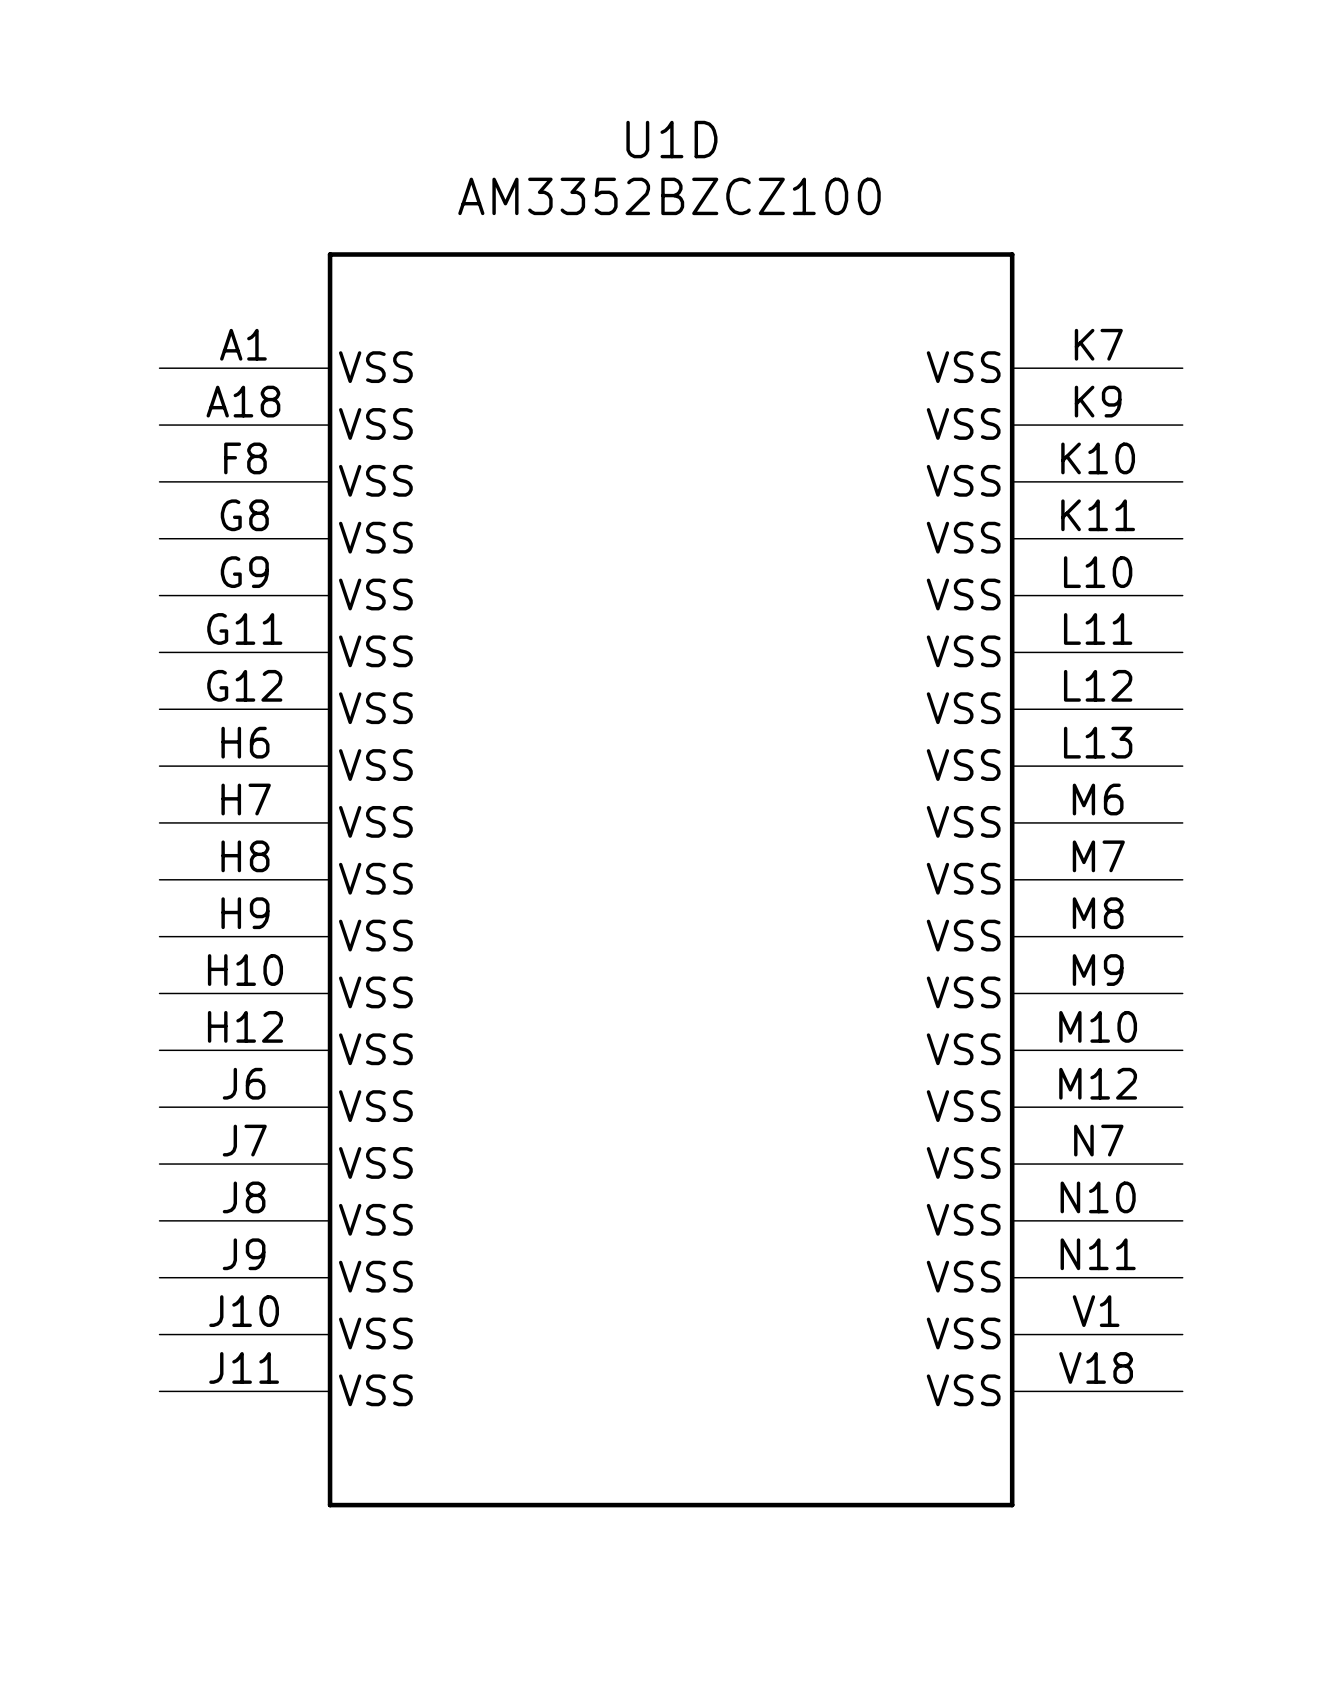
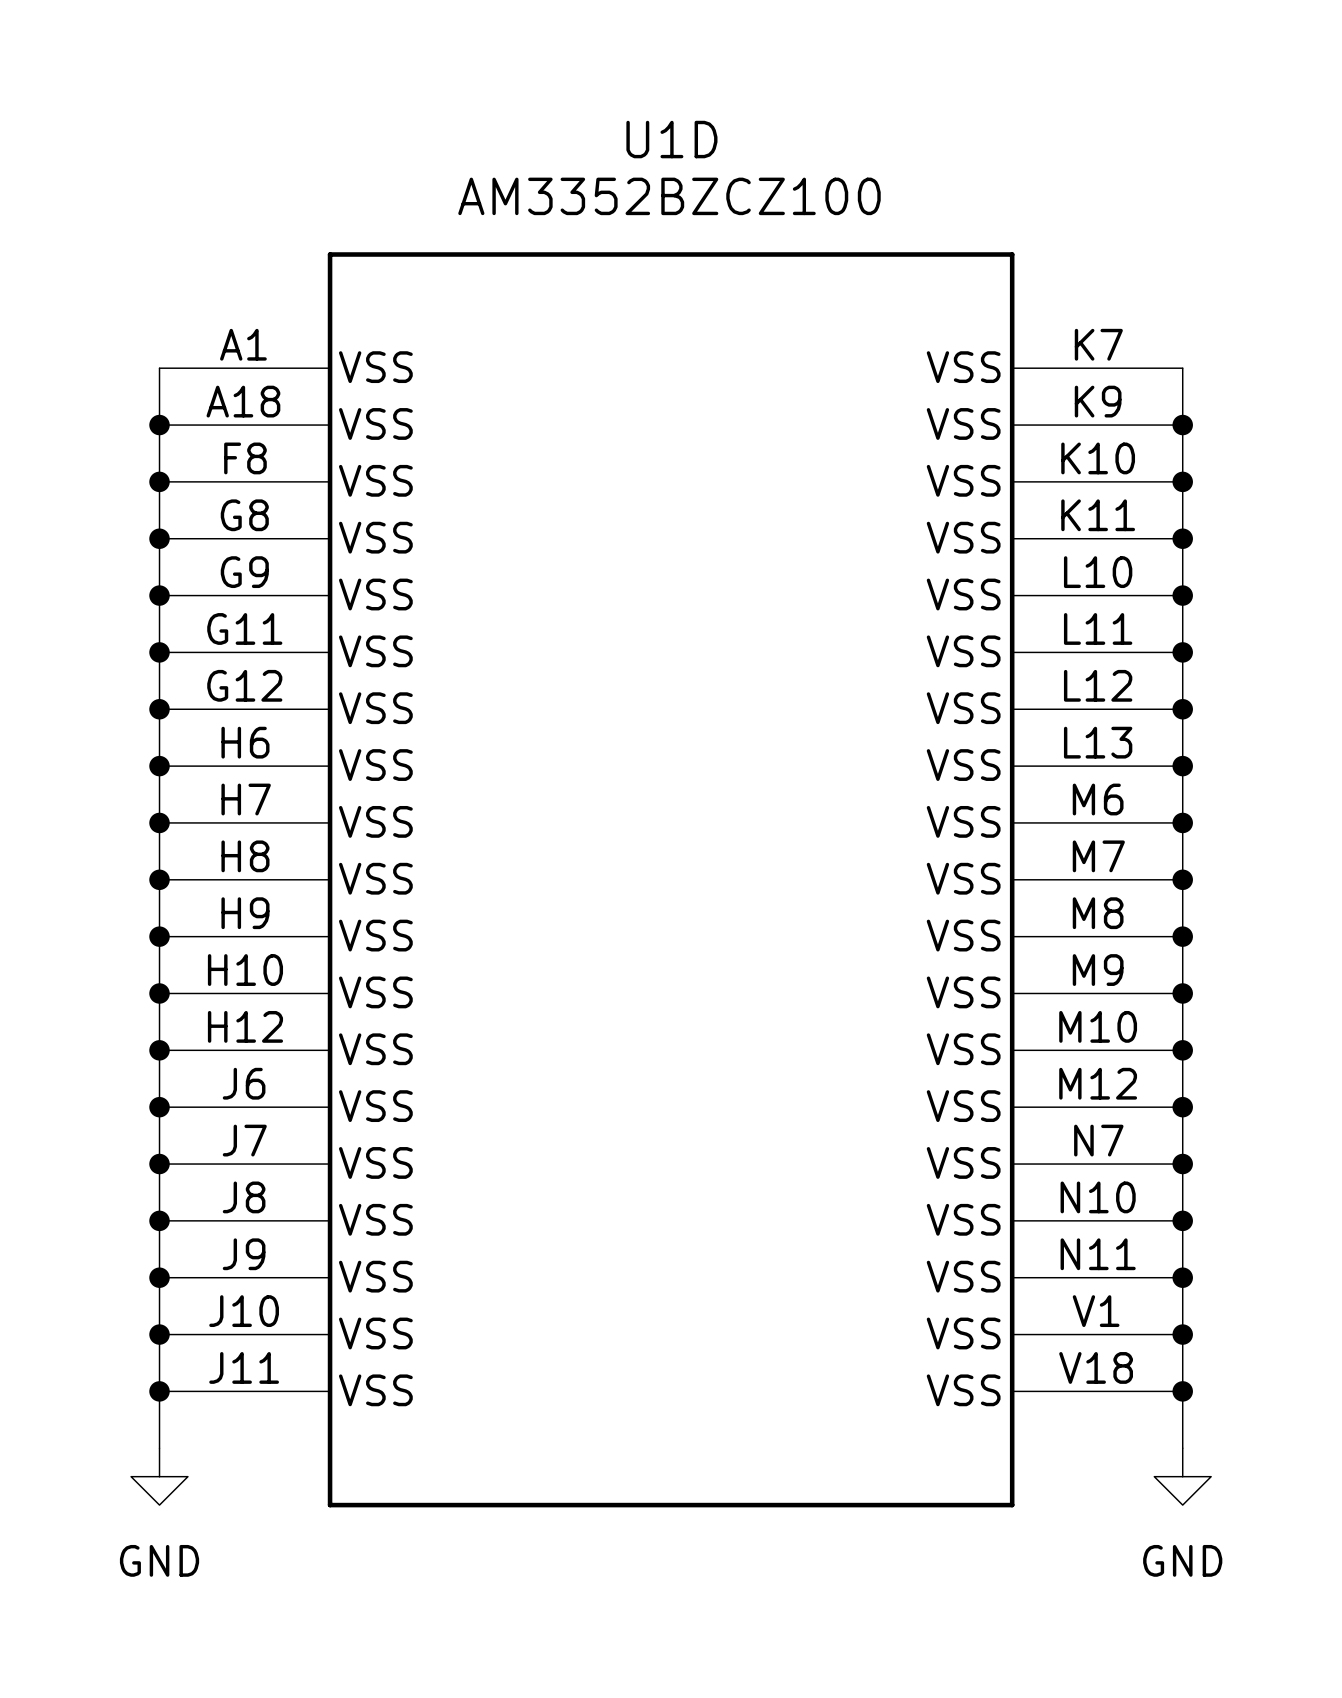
wire: none -> (159, 368) (159, 1448)
wire: none -> (1182, 368) (1182, 1448)
junction: none -> (159, 425)
junction: none -> (1182, 425)
junction: none -> (159, 481)
junction: none -> (1182, 481)
junction: none -> (159, 538)
junction: none -> (1182, 538)
junction: none -> (159, 595)
junction: none -> (1182, 595)
junction: none -> (159, 652)
junction: none -> (1182, 652)
junction: none -> (159, 709)
junction: none -> (1182, 709)
junction: none -> (159, 766)
junction: none -> (1182, 766)
junction: none -> (159, 822)
junction: none -> (1182, 822)
junction: none -> (159, 879)
junction: none -> (1182, 879)
junction: none -> (159, 936)
junction: none -> (1182, 936)
junction: none -> (159, 993)
junction: none -> (1182, 993)
junction: none -> (159, 1050)
junction: none -> (1182, 1050)
junction: none -> (159, 1107)
junction: none -> (1182, 1107)
junction: none -> (159, 1164)
junction: none -> (1182, 1164)
junction: none -> (159, 1220)
junction: none -> (1182, 1220)
junction: none -> (159, 1277)
junction: none -> (1182, 1277)
junction: none -> (159, 1334)
junction: none -> (1182, 1334)
junction: none -> (159, 1391)
junction: none -> (1182, 1391)
power symbol: none -> GND (159, 1476)
power symbol: none -> GND (1182, 1476)

